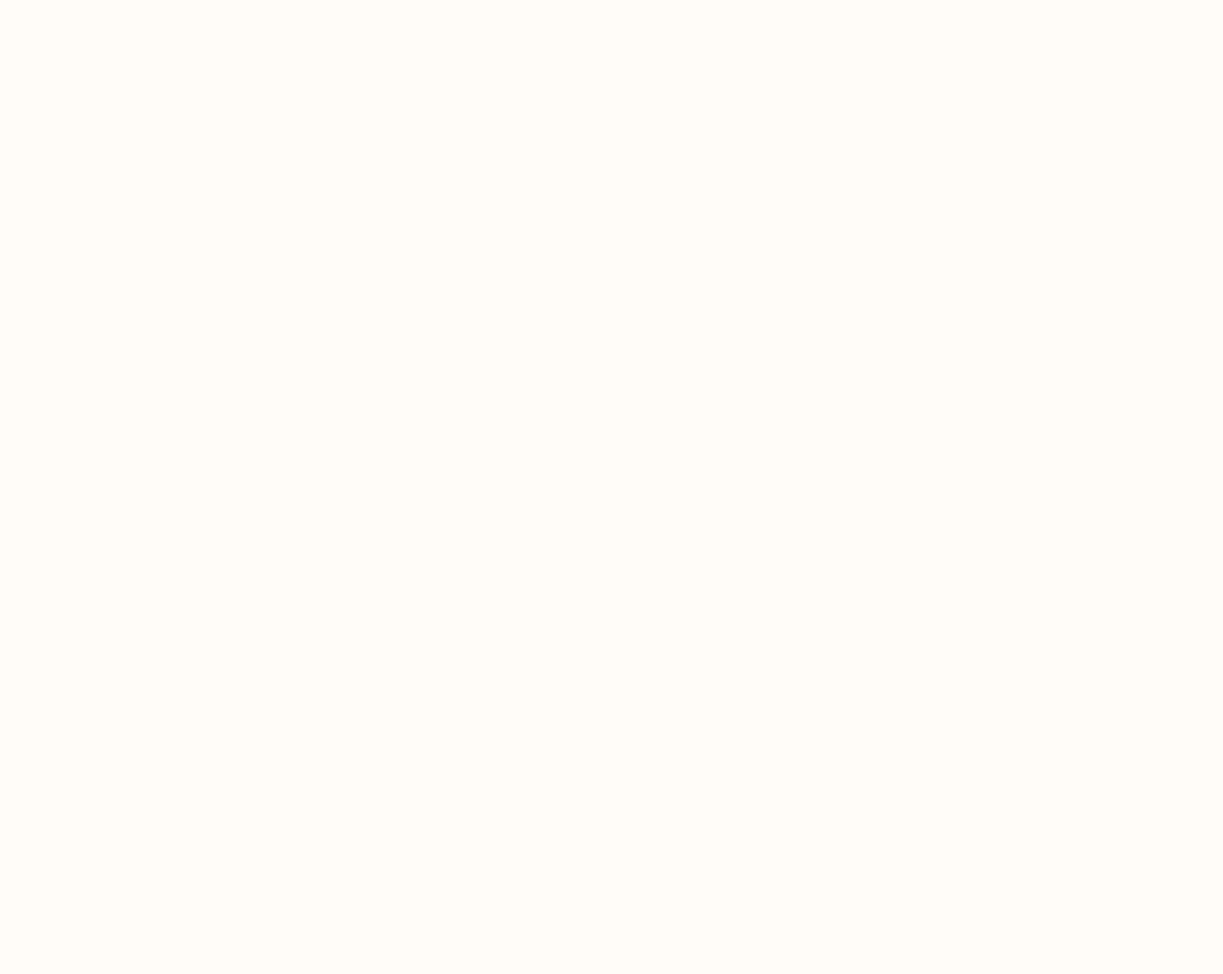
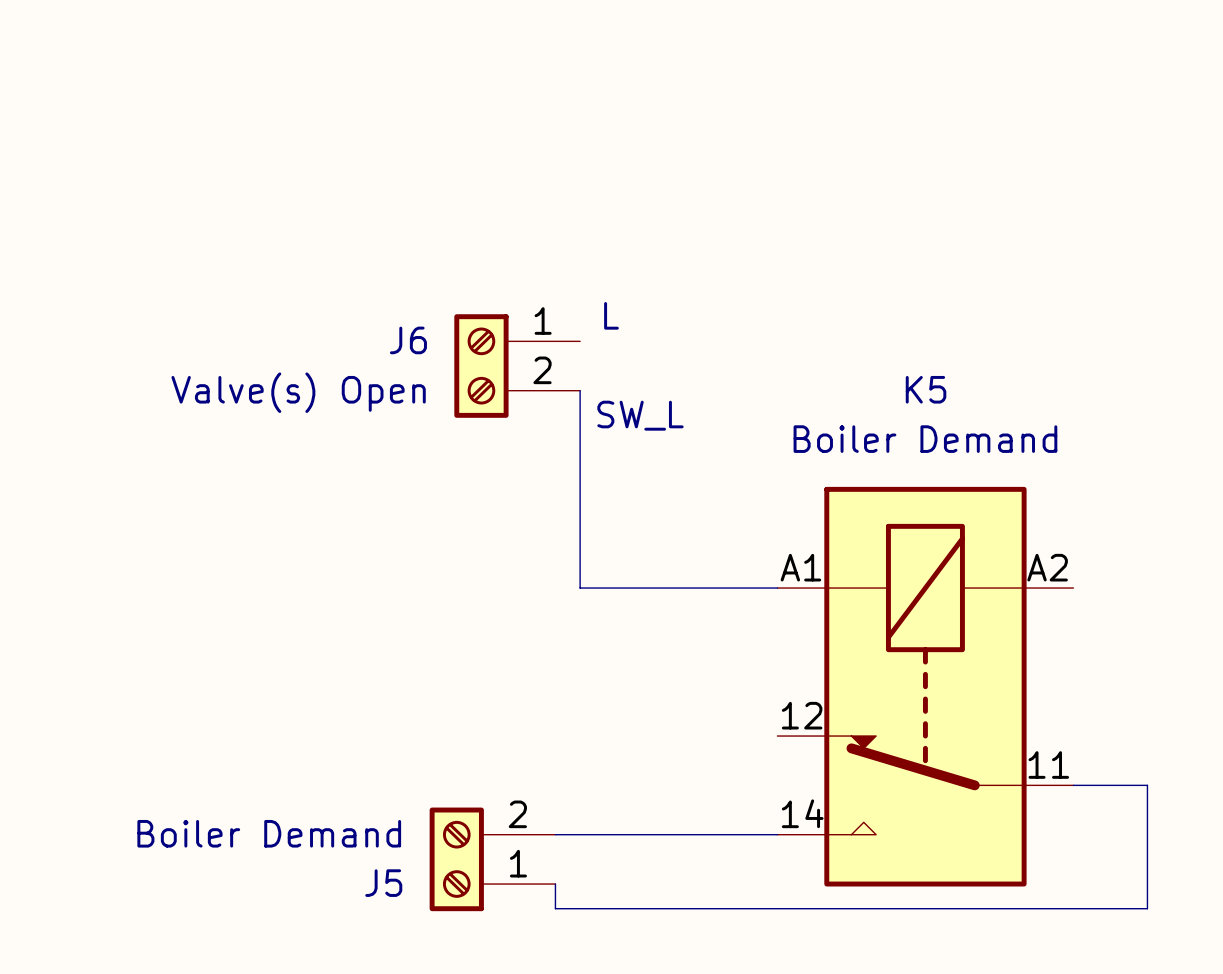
text: none -> L (611, 315)
J6: none -> Valve(s) Open (517, 366)
wire: none -> (580, 390) (580, 588) (777, 588)
text: none -> SW_L (640, 415)
K5: none -> Boiler Demand (925, 686)
wire: none -> (1073, 785) (1147, 785) (1147, 908) (555, 908) (555, 884)
wire: none -> (555, 834) (777, 834)
J5: none -> Boiler Demand (492, 859)

